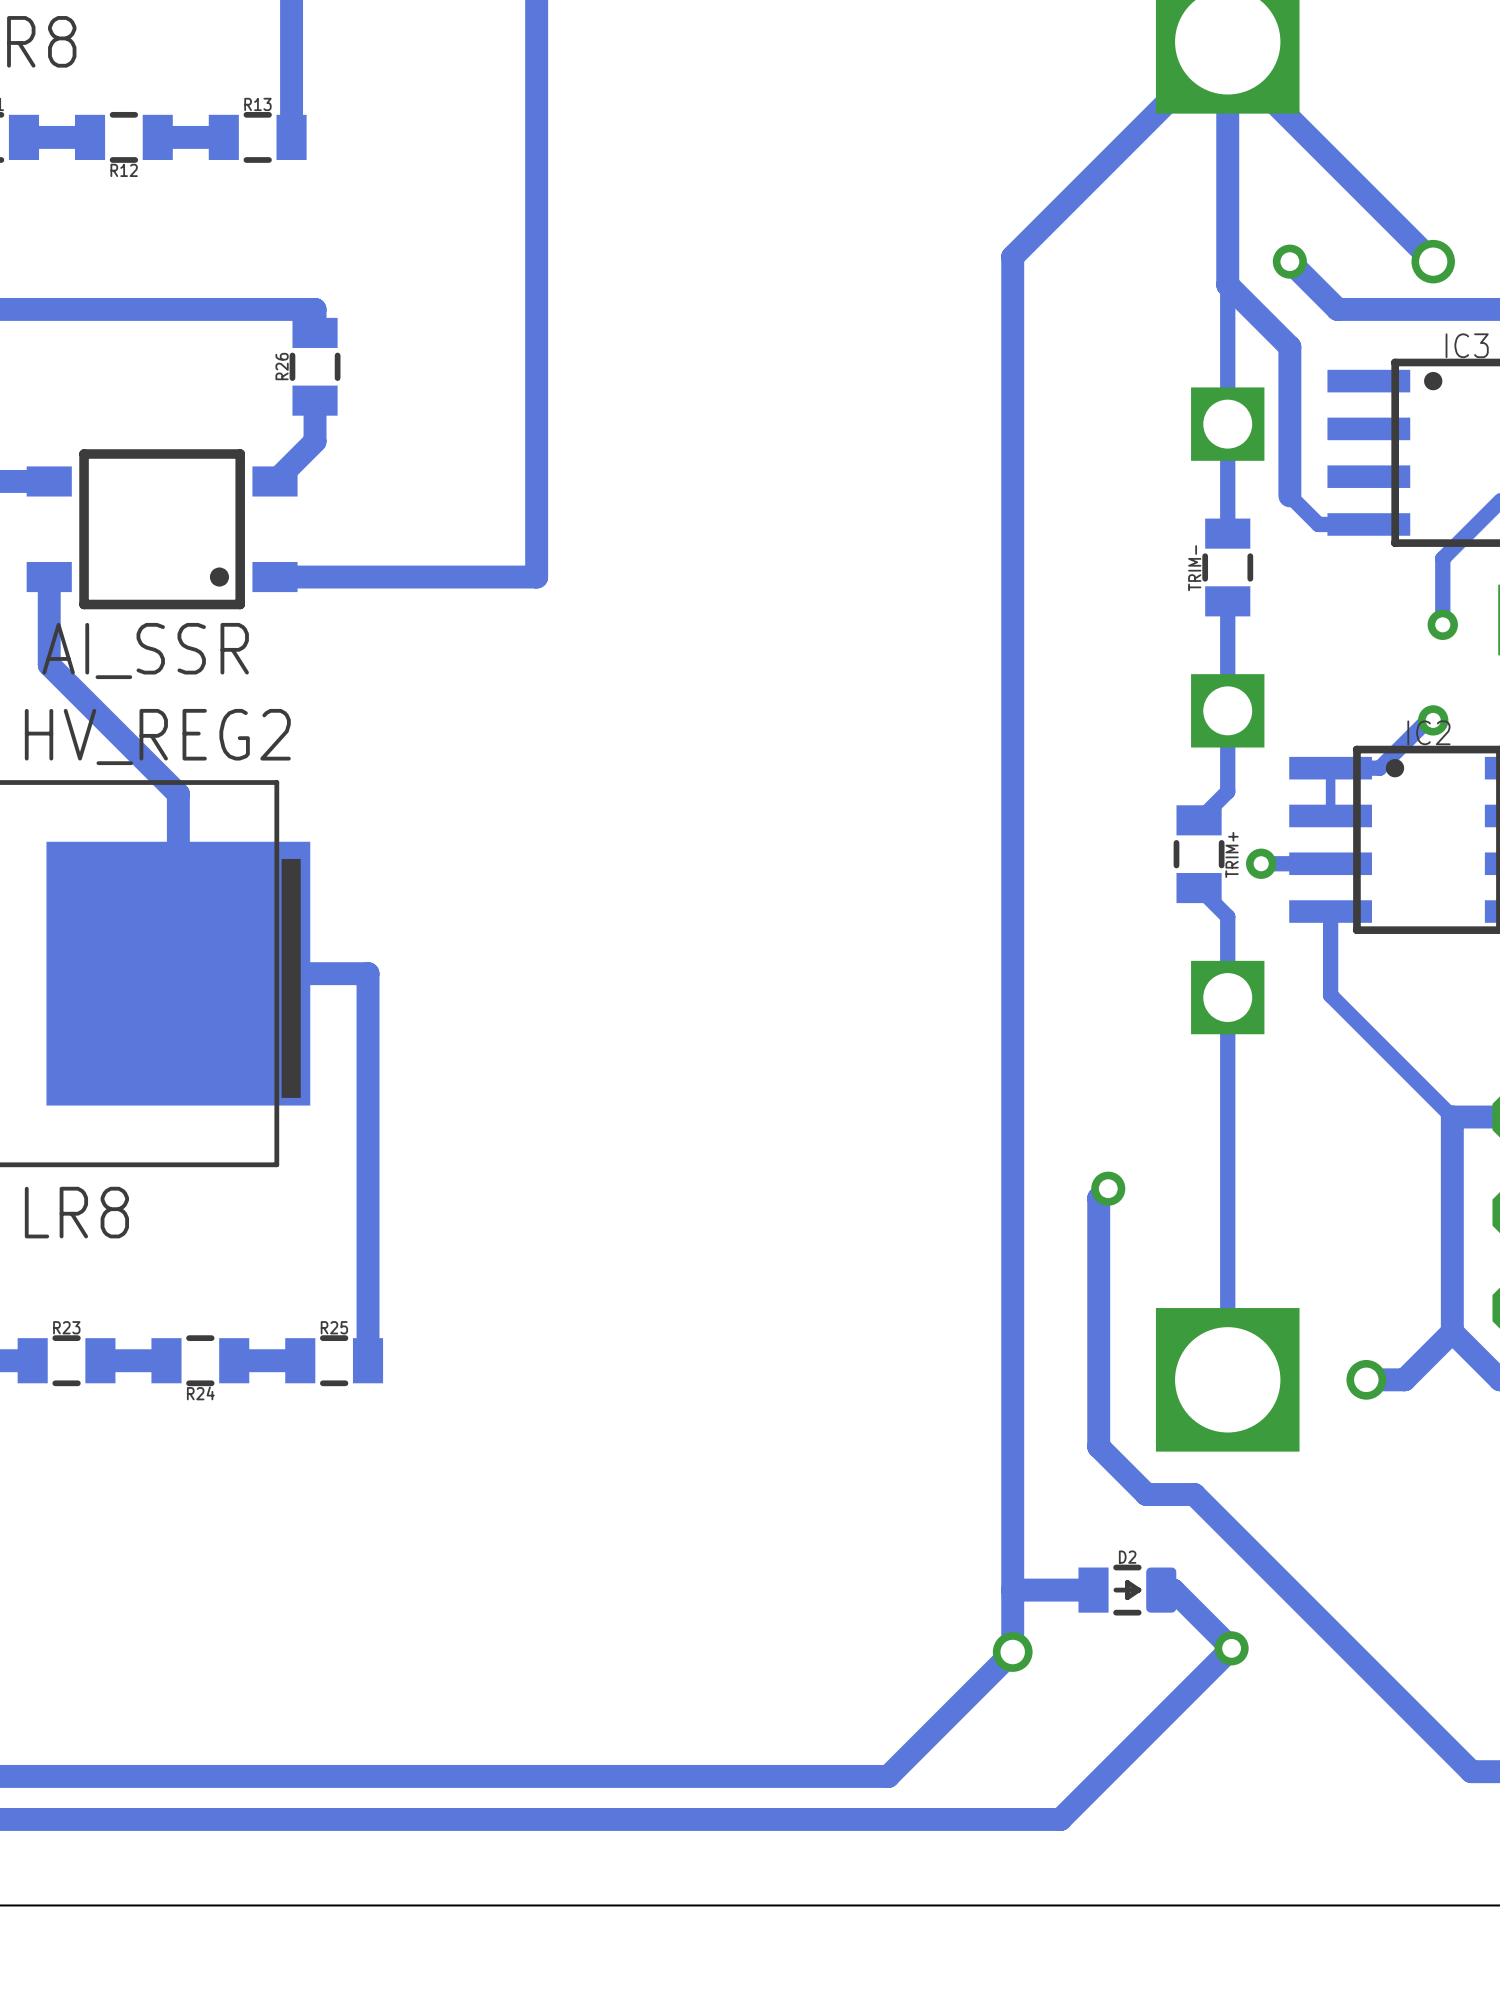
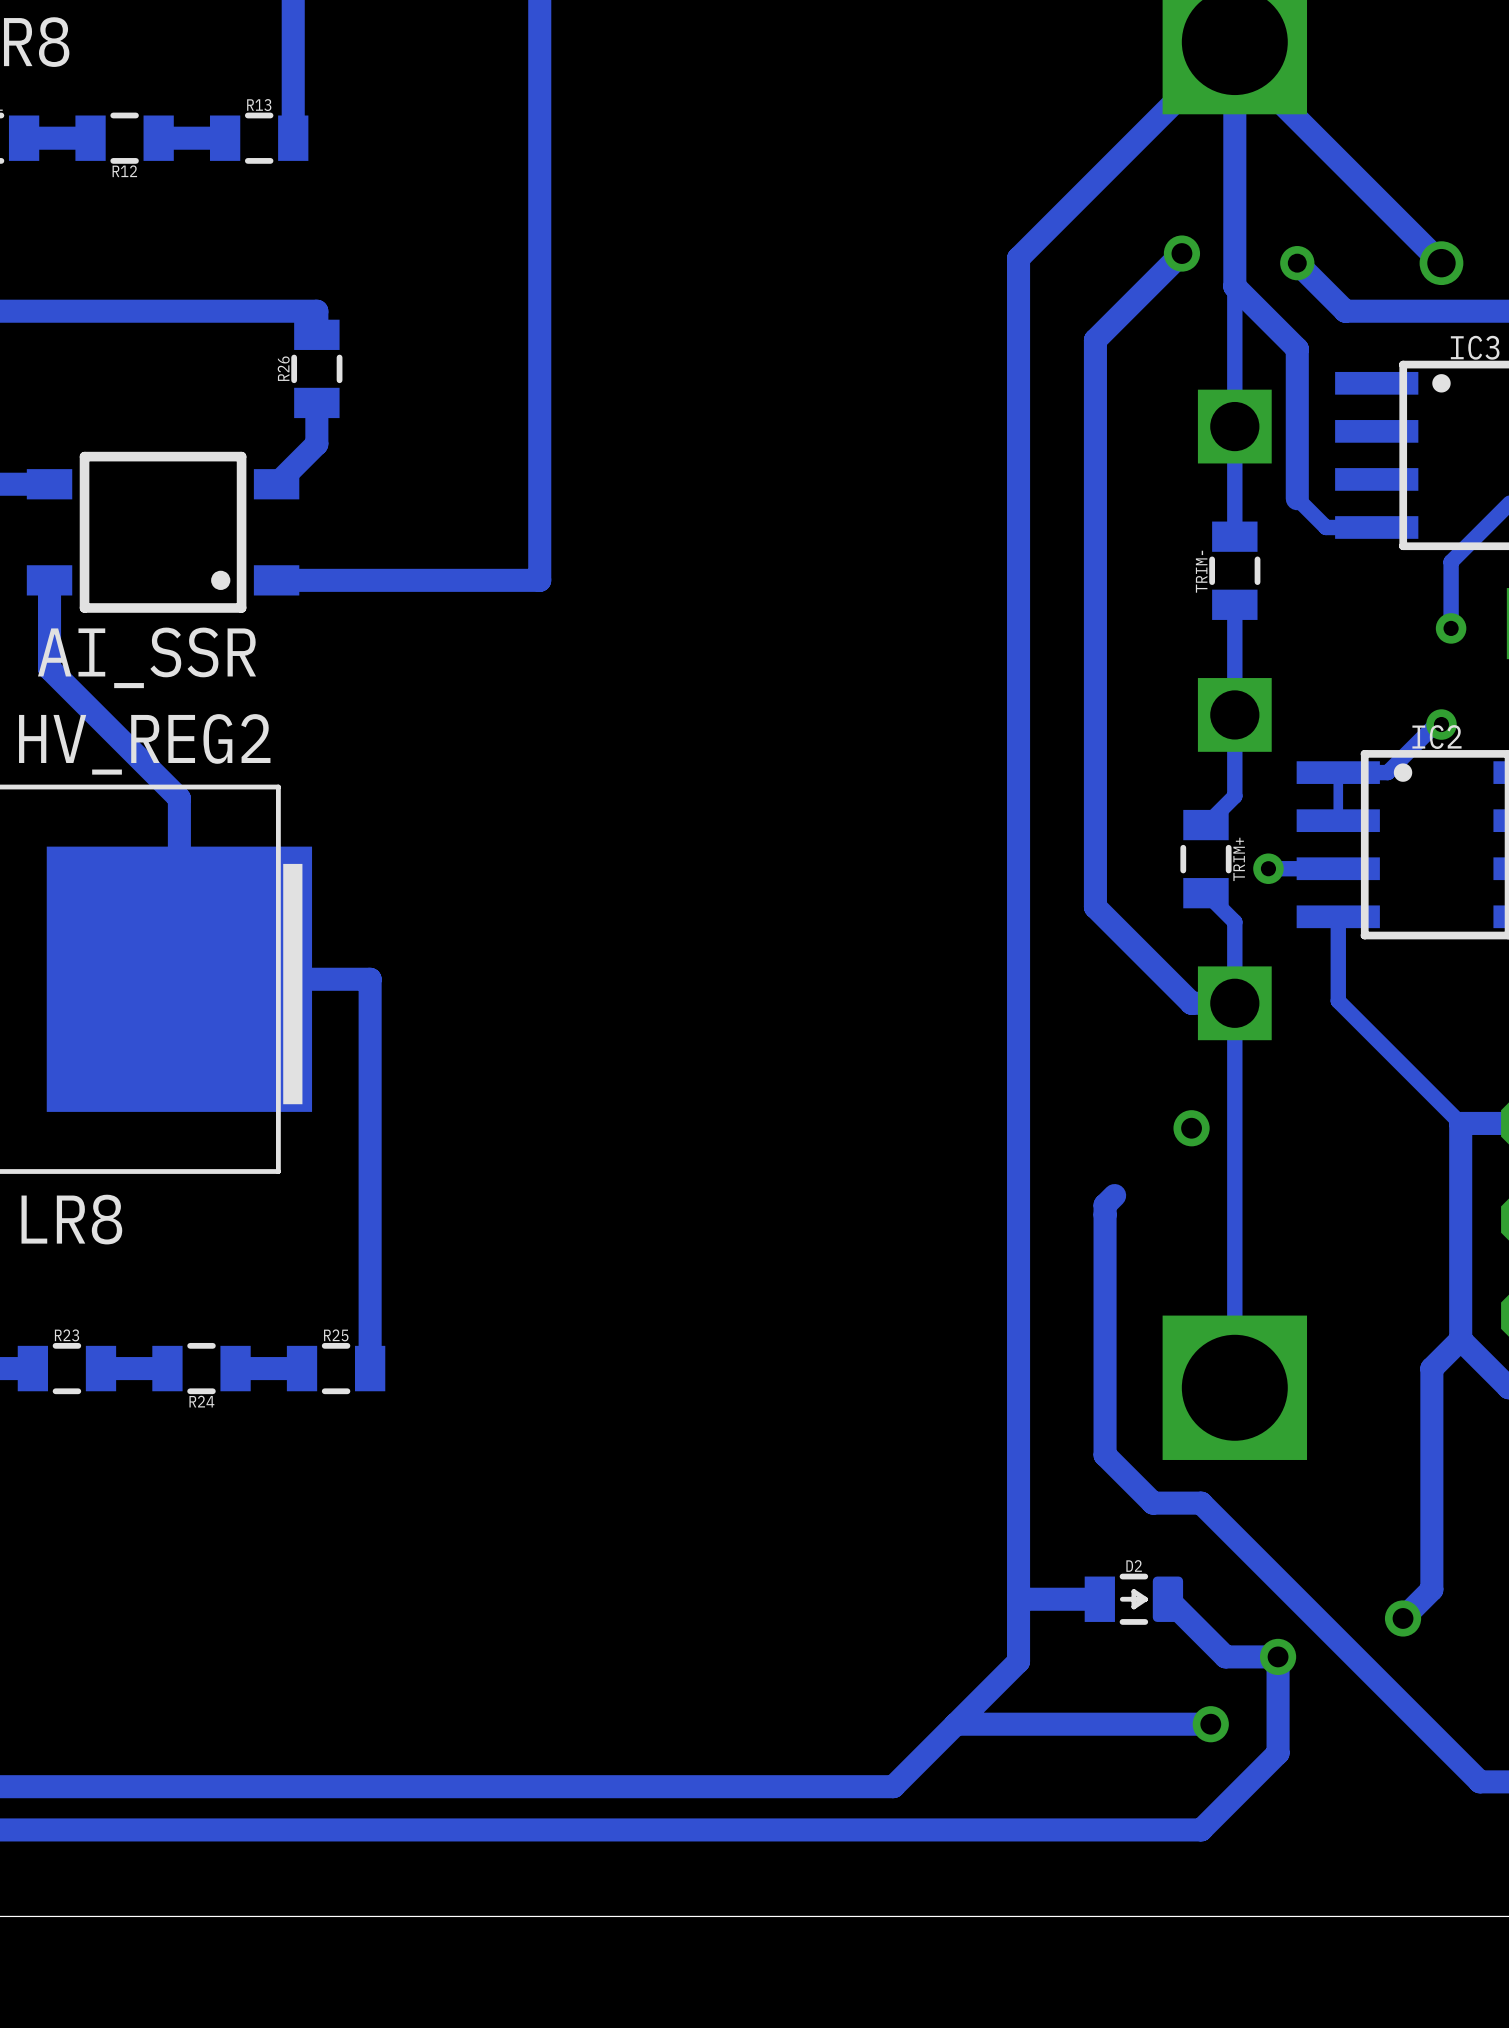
track: none -> (1181, 253) (1095, 340) (1095, 907) (1191, 1003) (1234, 1003)
via: none -> (1181, 253)
via: none -> (1191, 1128)
via: (1108, 1188) -> none
track: (1423, 1360) (1404, 1379) (1366, 1379) -> (1431, 1368) (1431, 1589) (1403, 1618)
via: (1366, 1379) -> none
track: (1161, 1590) (1173, 1590) (1231, 1648) (1060, 1819) -> (1167, 1599) (1225, 1656) (1278, 1656) (1278, 1753) (1201, 1829) (1066, 1829)
via: none -> (1403, 1618)
via: none -> (1278, 1656)
via: (1231, 1648) -> none
via: (1012, 1652) -> none
track: none -> (1210, 1724) (955, 1724)
via: none -> (1210, 1724)

